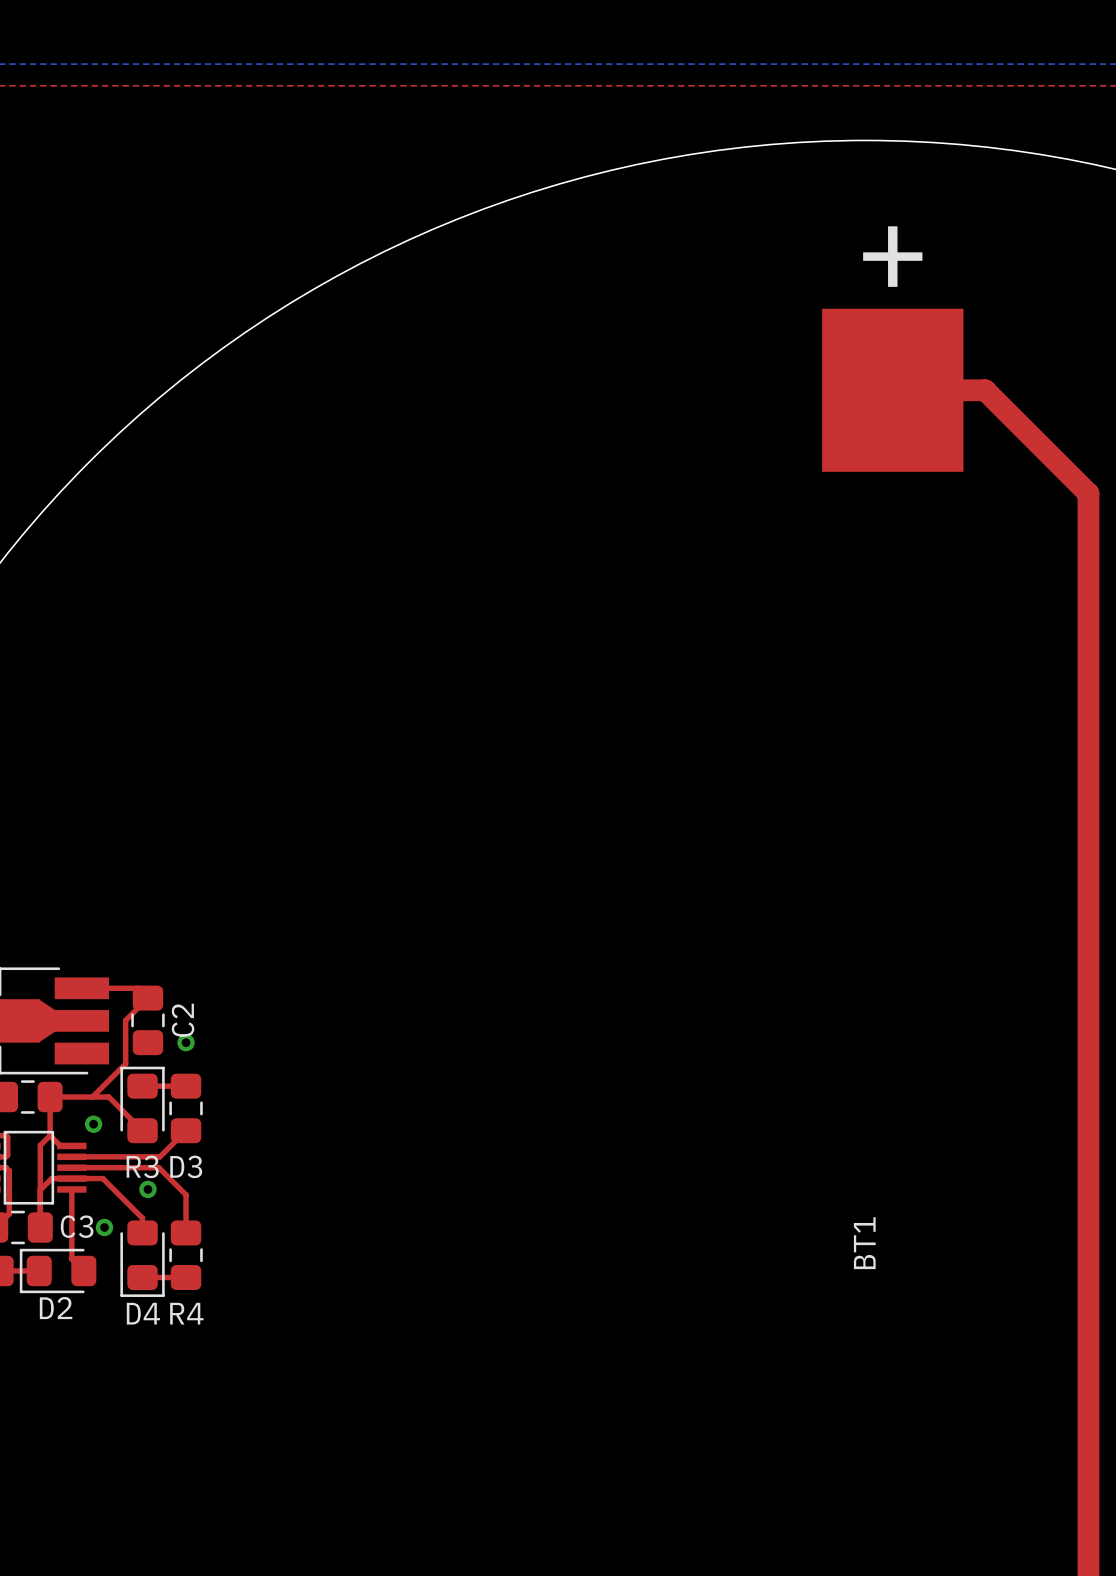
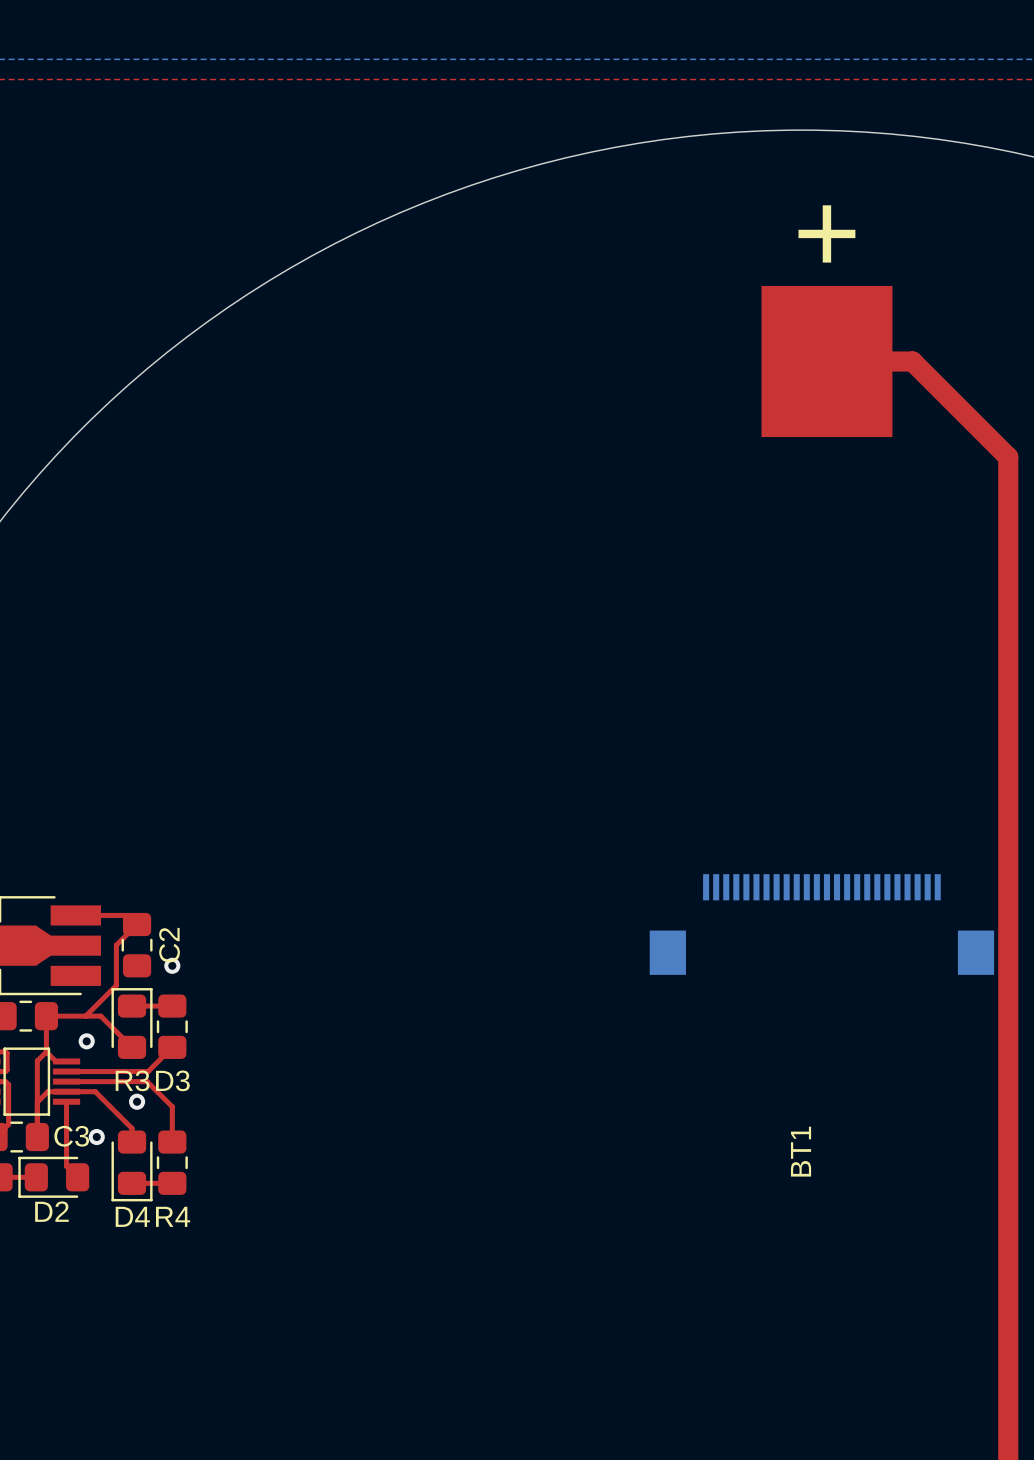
part: none -> (821, 924)

